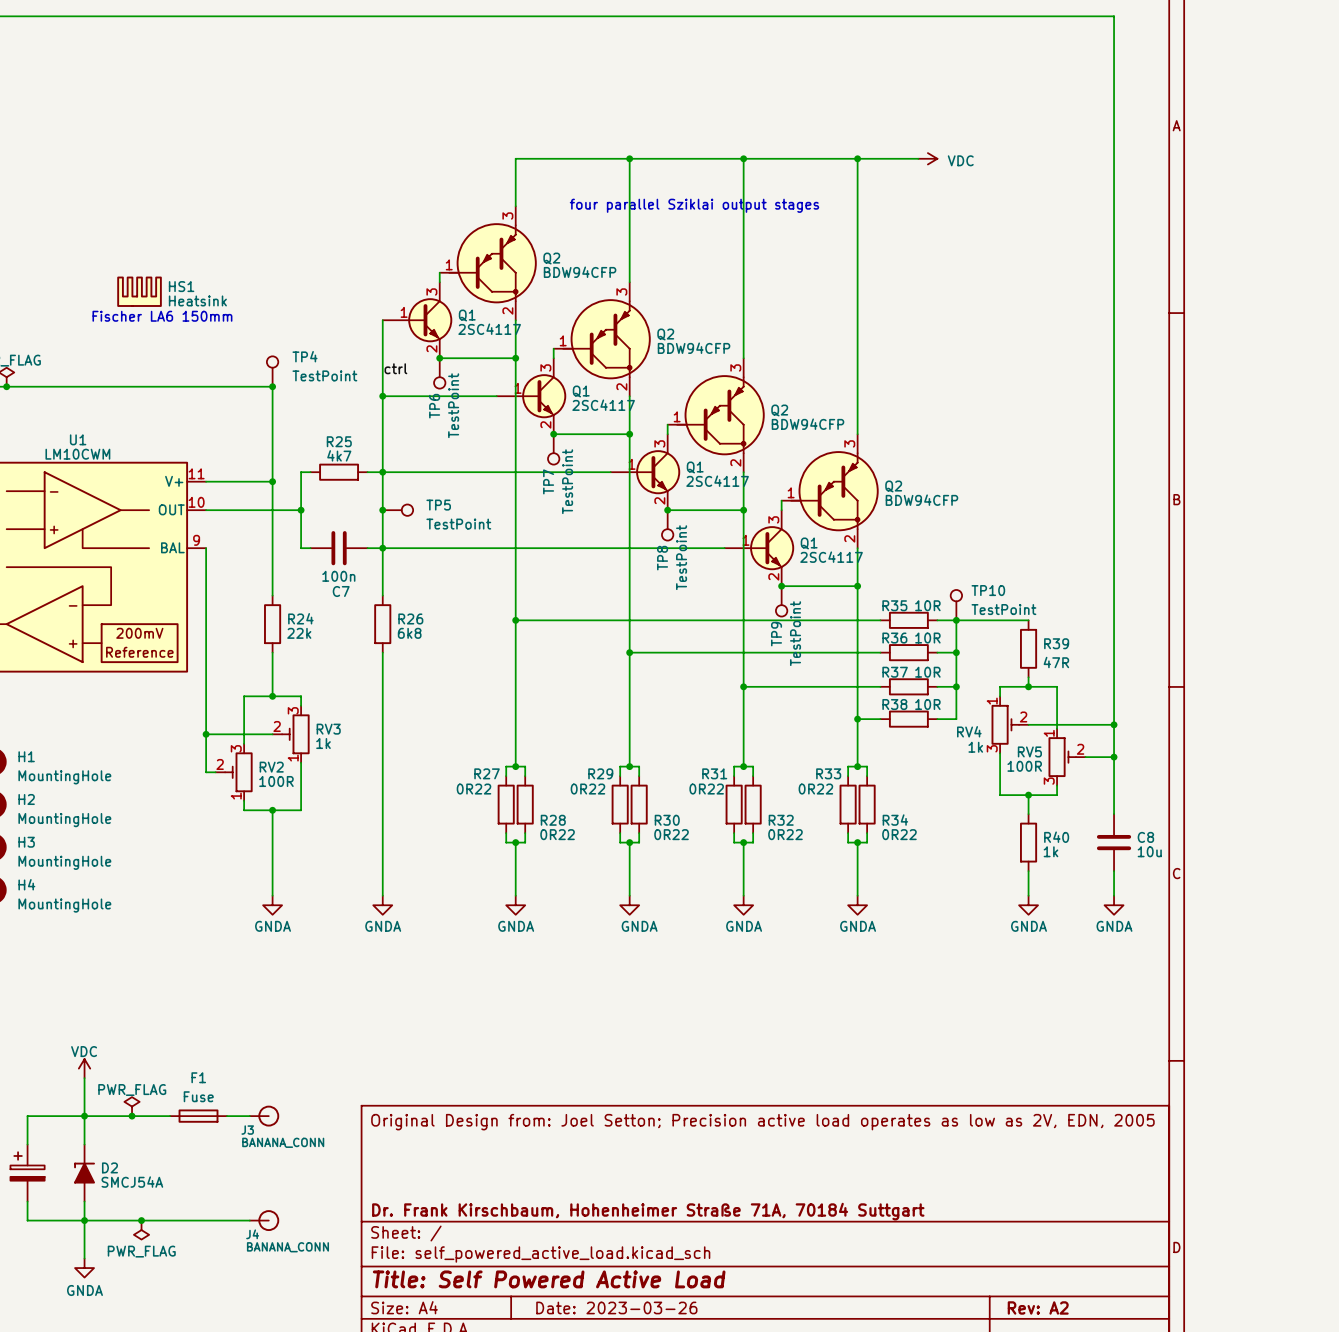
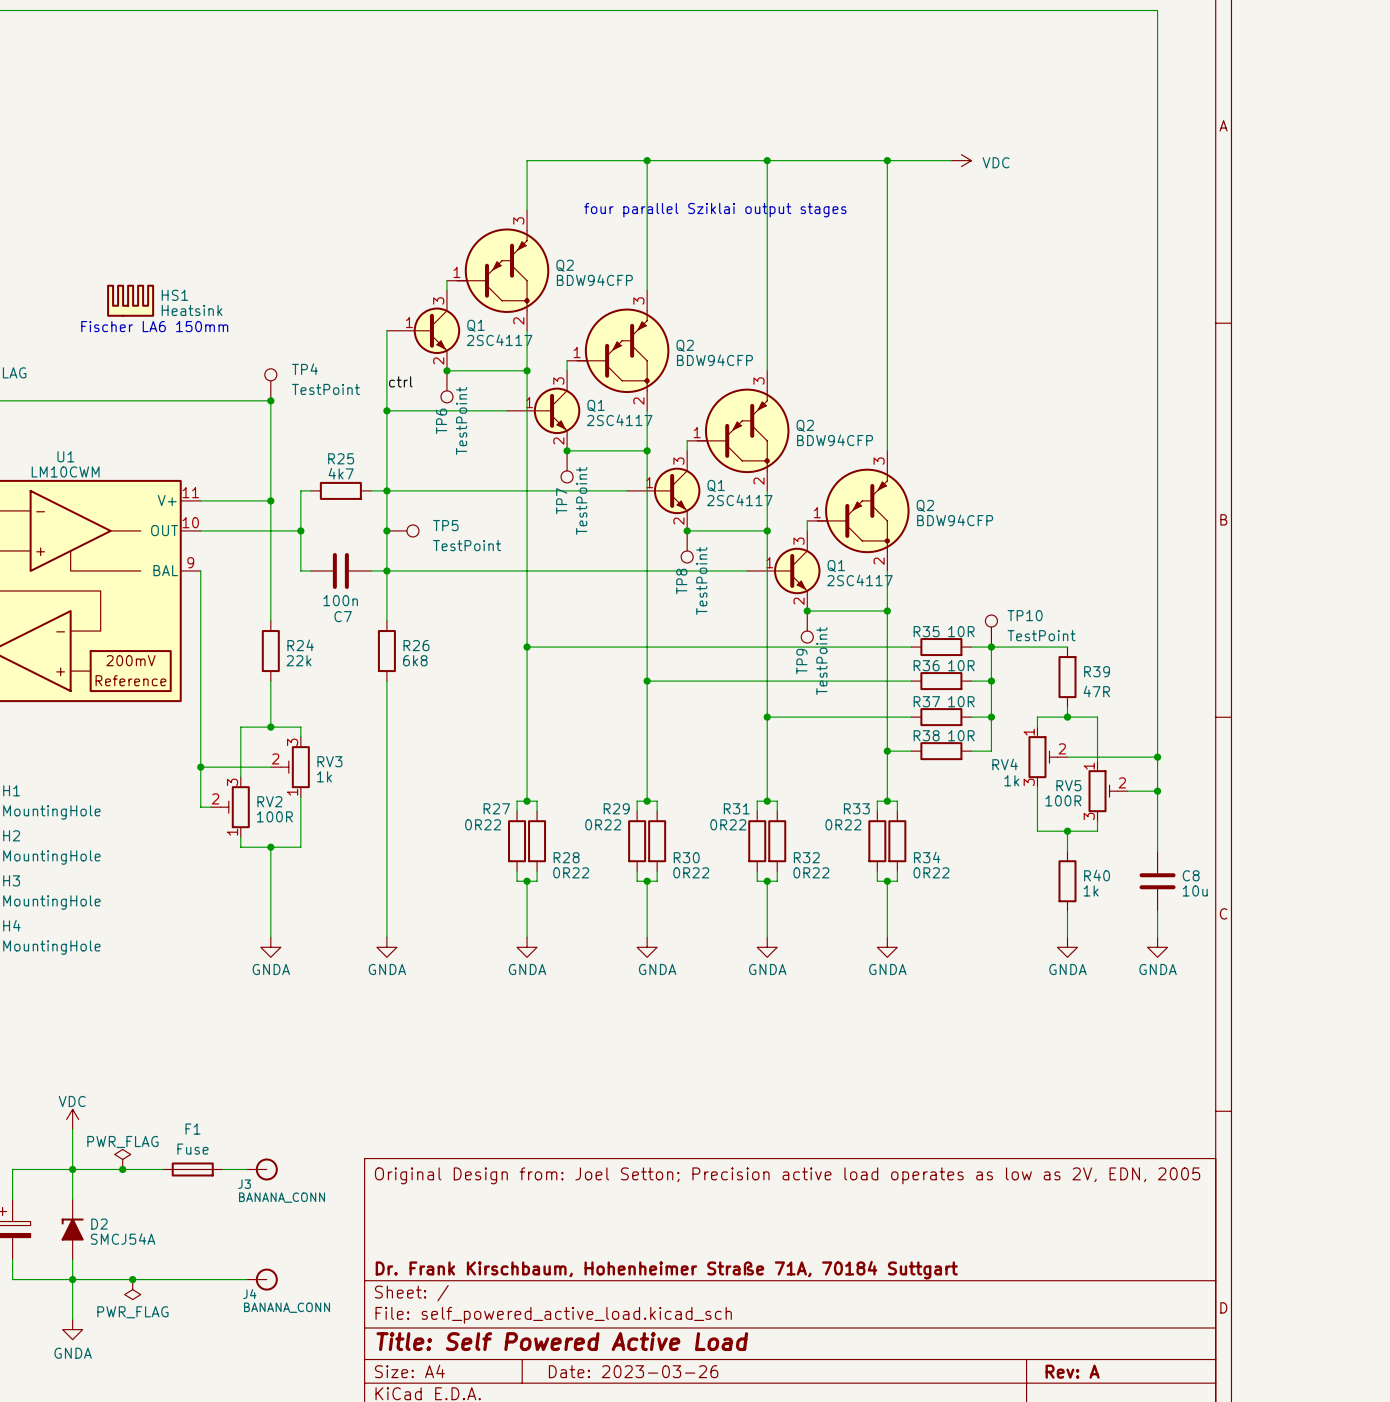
title block: Rev: A2 (1038, 1307) -> Rev: A (1072, 1371)

